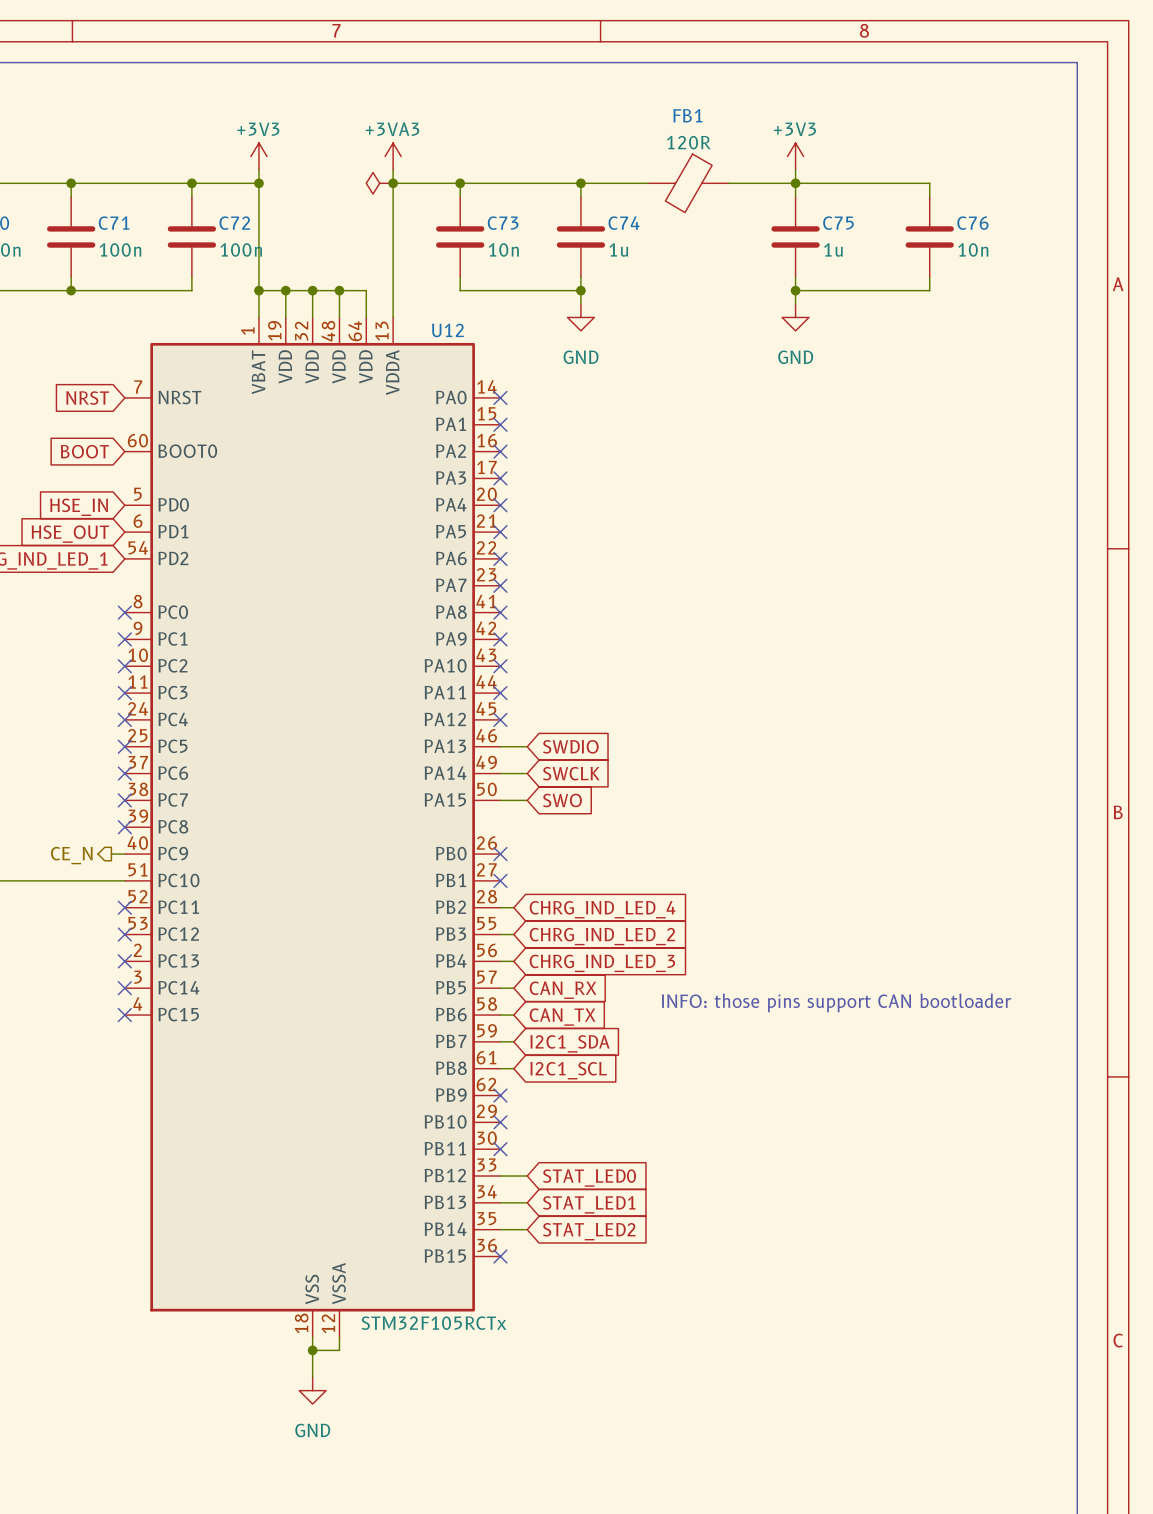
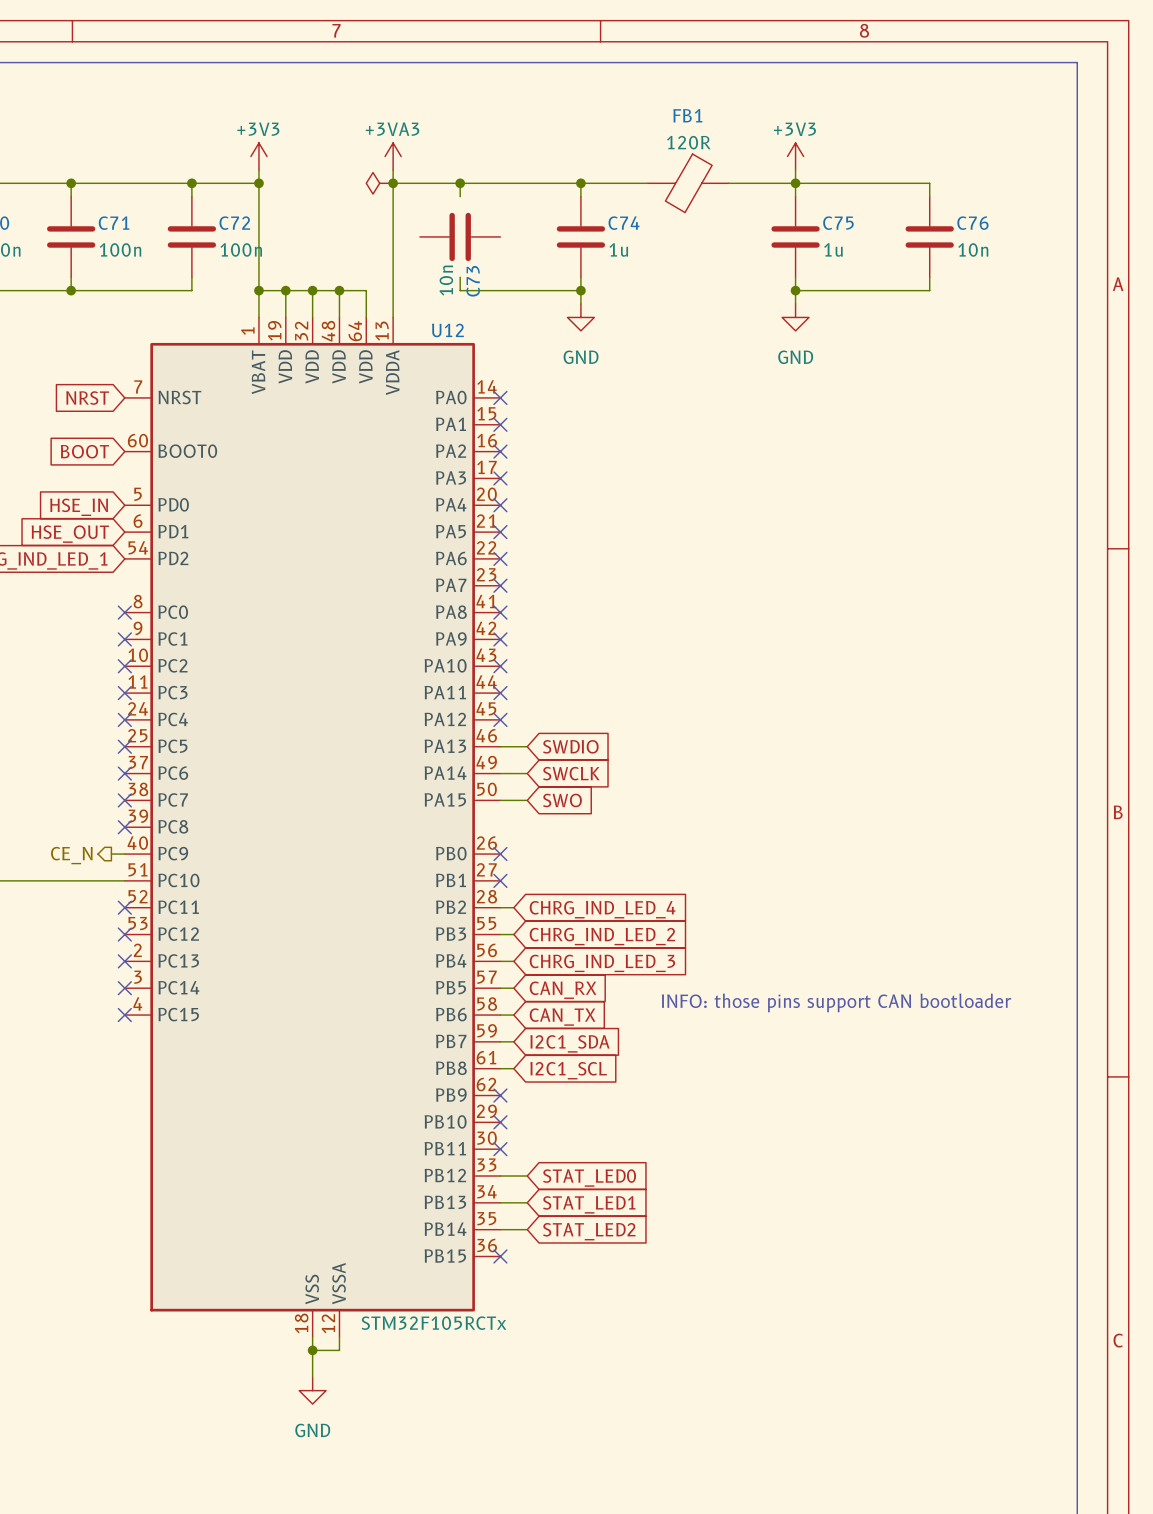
C73 rotation: 0° (460, 236) -> 90° clockwise (460, 236)

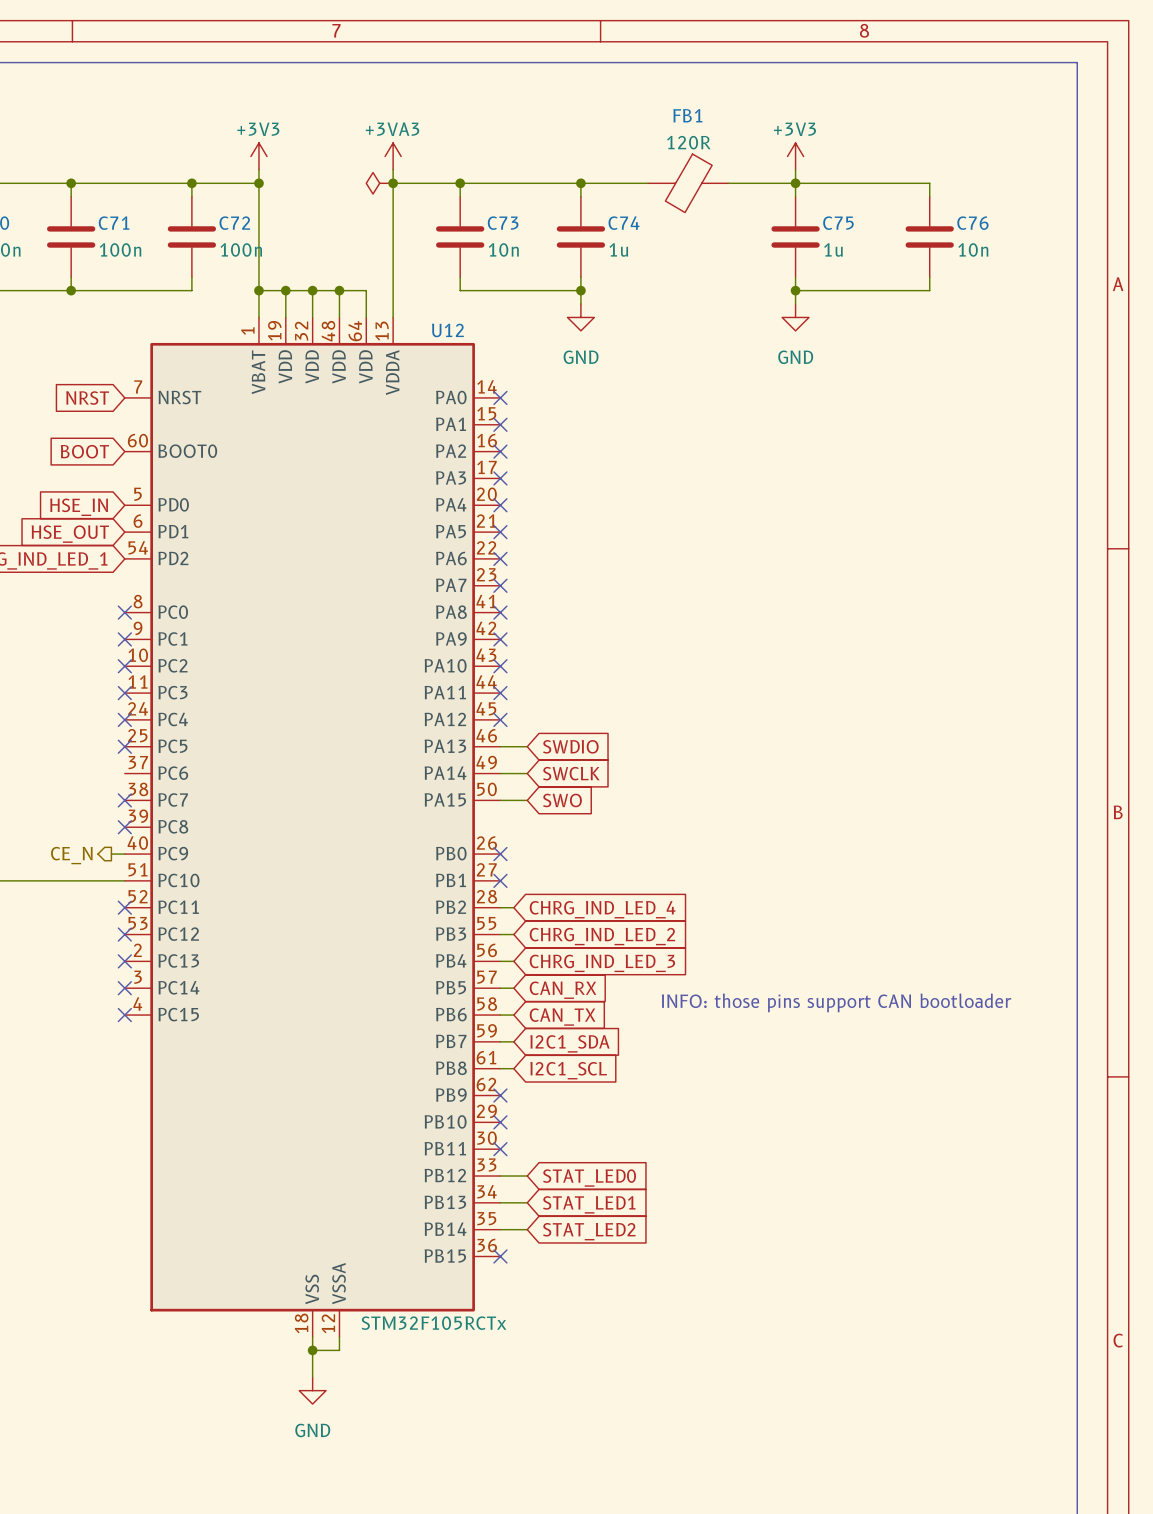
C73 rotation: 0° (460, 236) -> 90° clockwise (460, 236)
C73 value position: 10n (446, 280) -> 10n (503, 249)
C73 name position: C73 (473, 281) -> C73 (503, 223)
no-connect mark: (124, 773) -> none

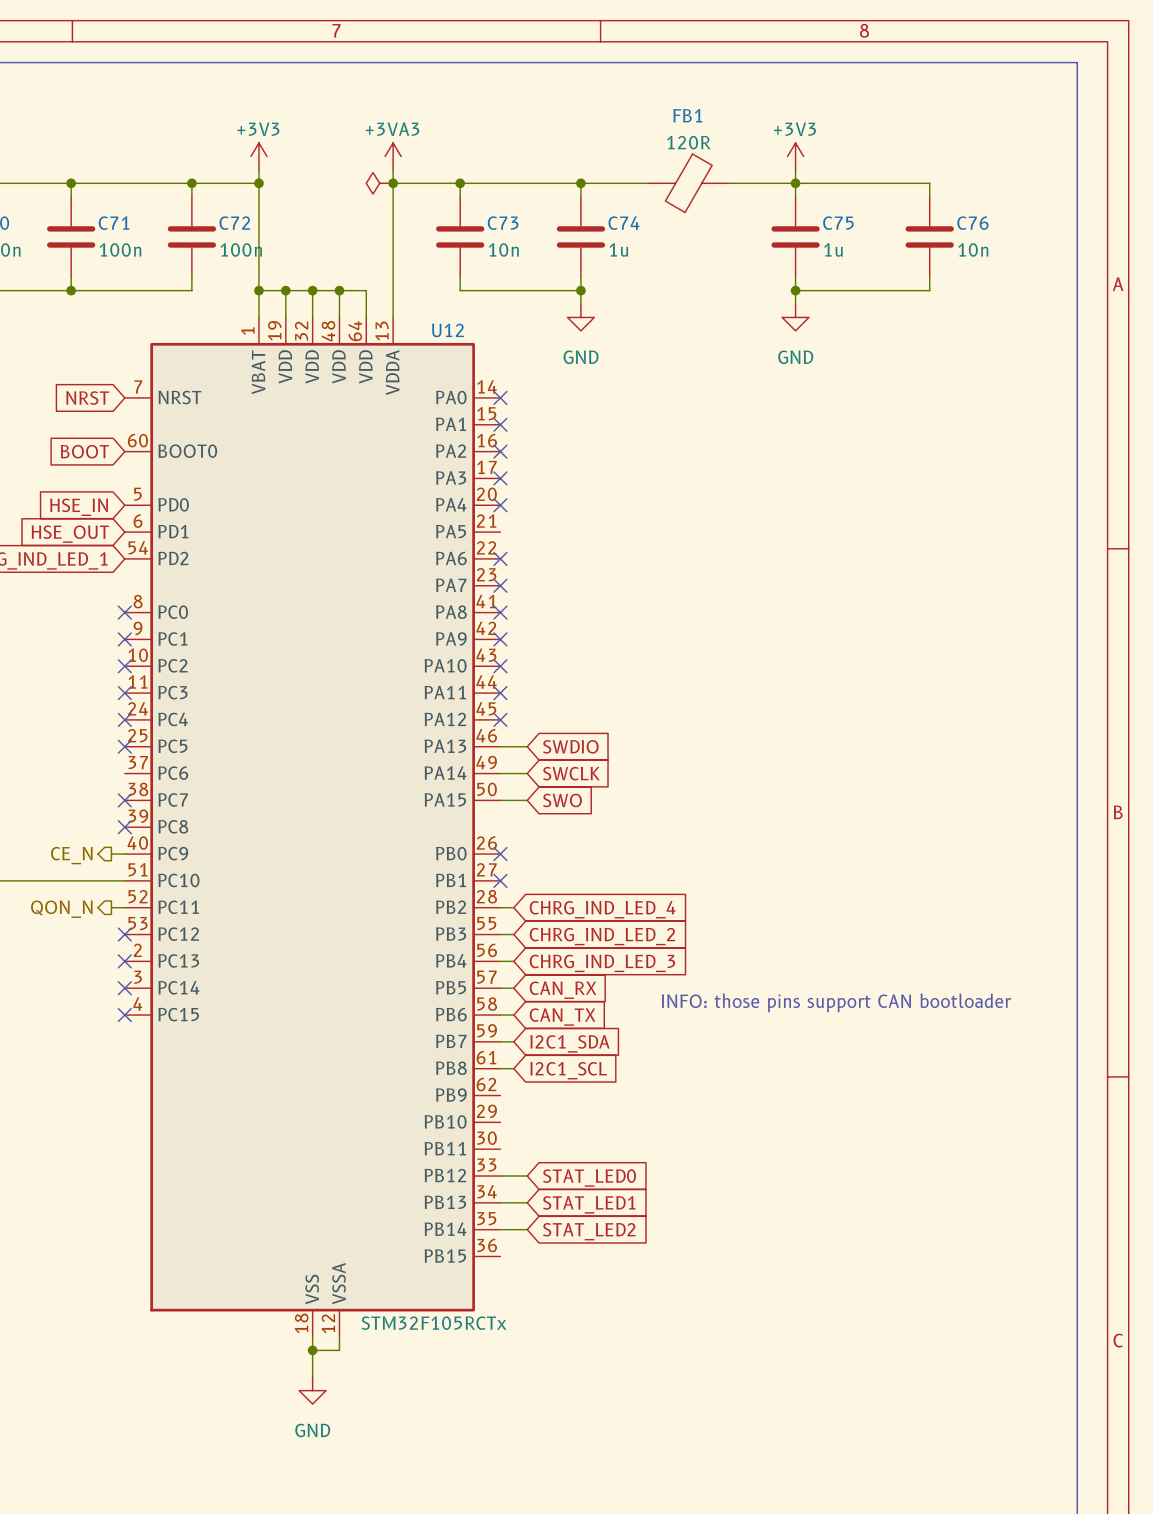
no-connect mark: (500, 532) -> none
wire: none -> (111, 907) (124, 907)
no-connect mark: (124, 907) -> none
hierarchical label: none -> QON_N (61, 909)
no-connect mark: (500, 1095) -> none
no-connect mark: (500, 1122) -> none
no-connect mark: (500, 1149) -> none
no-connect mark: (500, 1256) -> none

